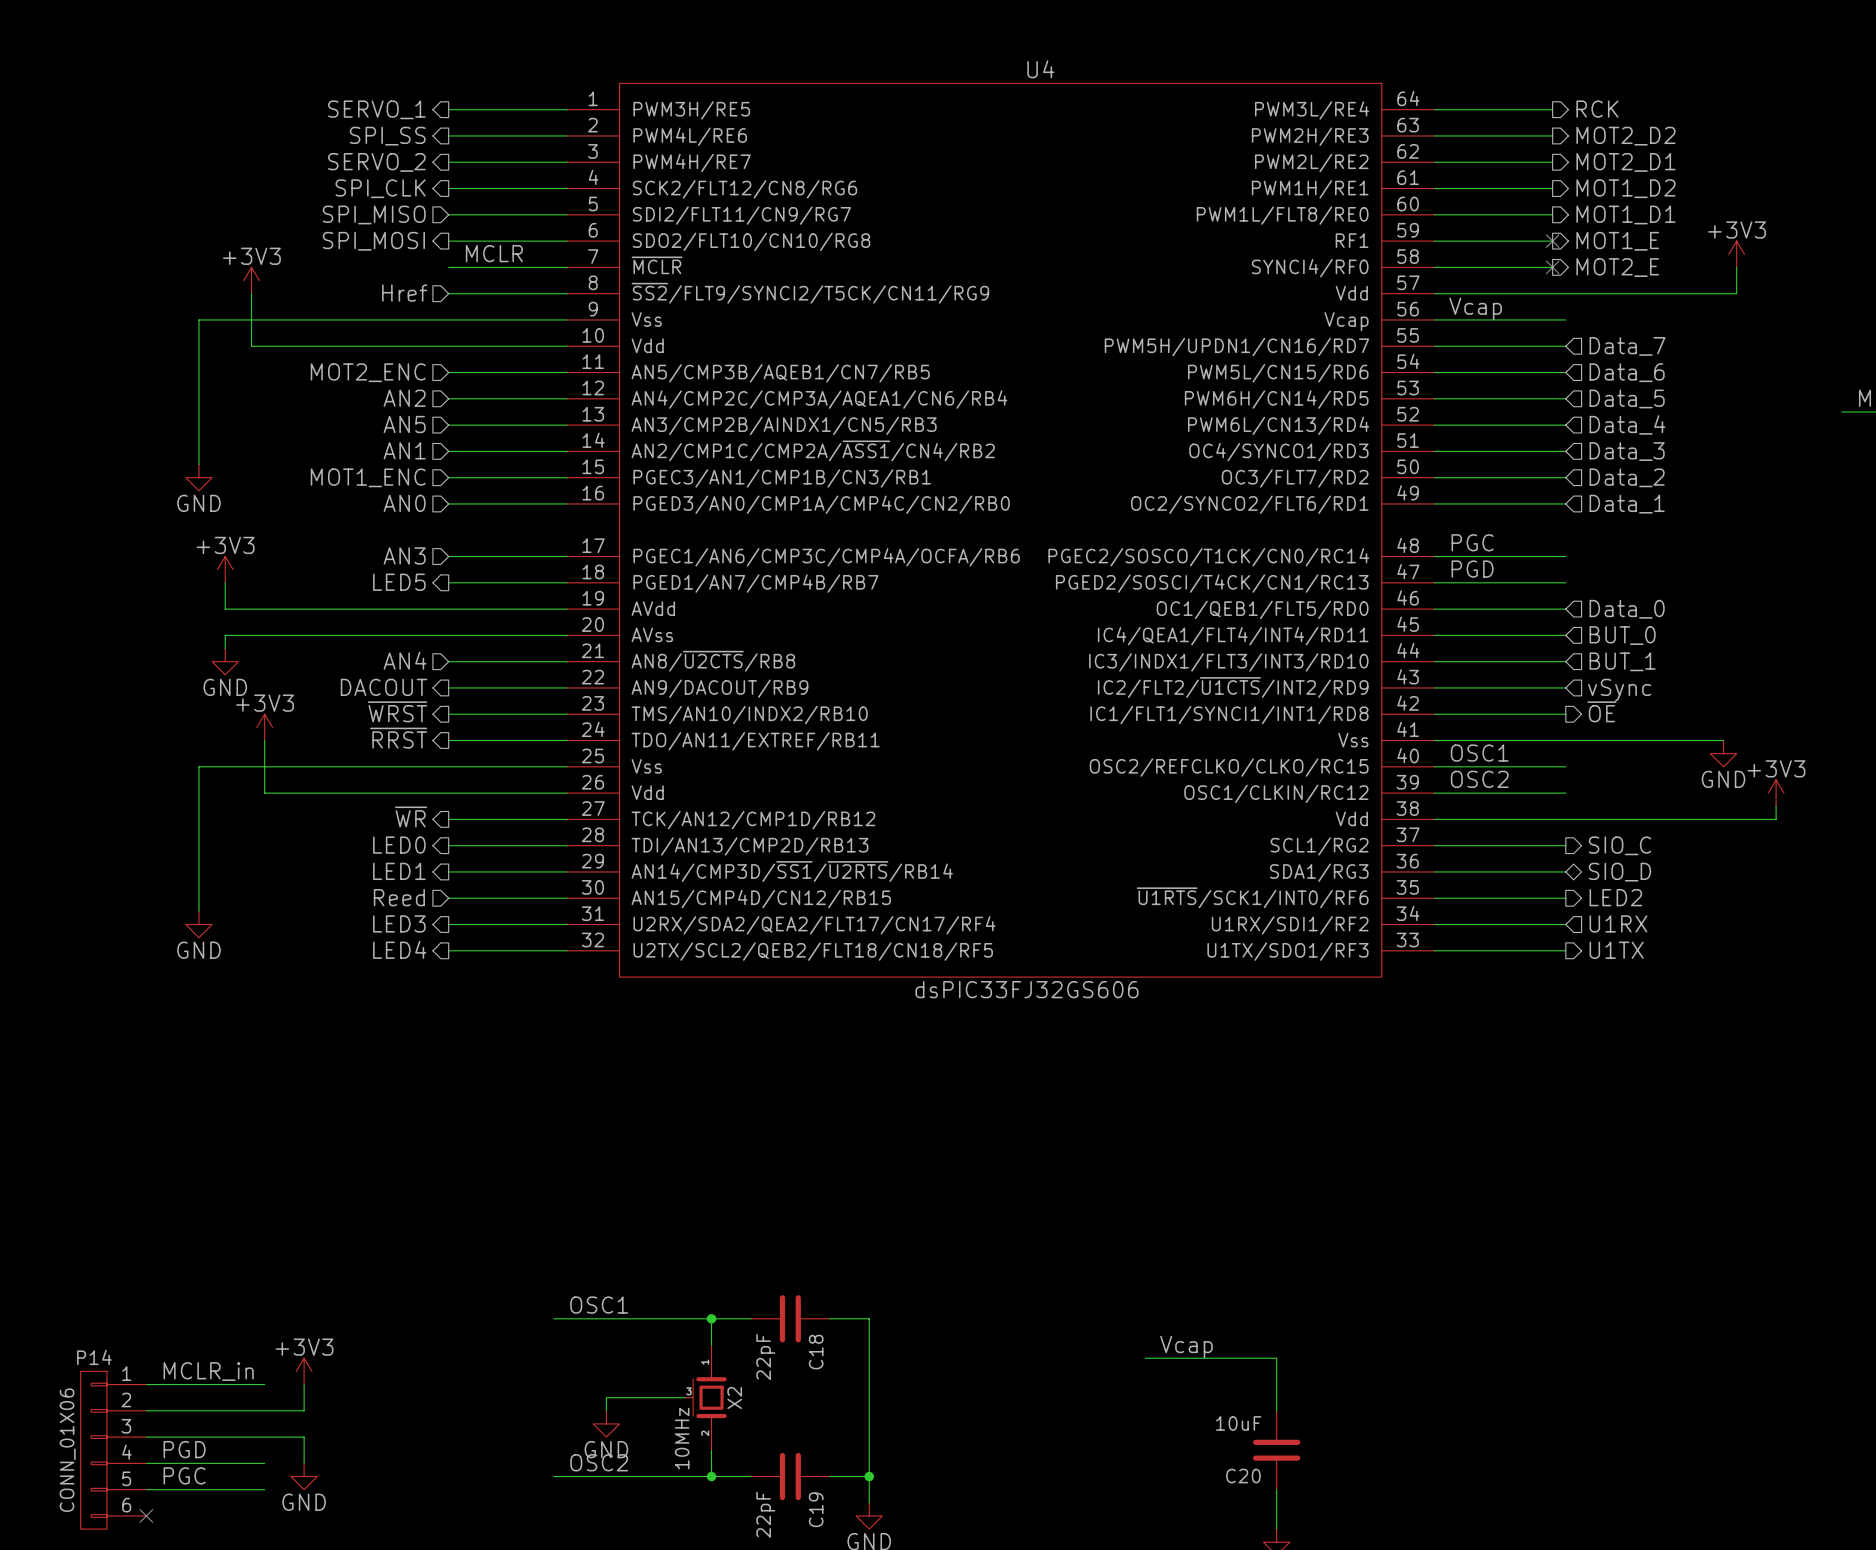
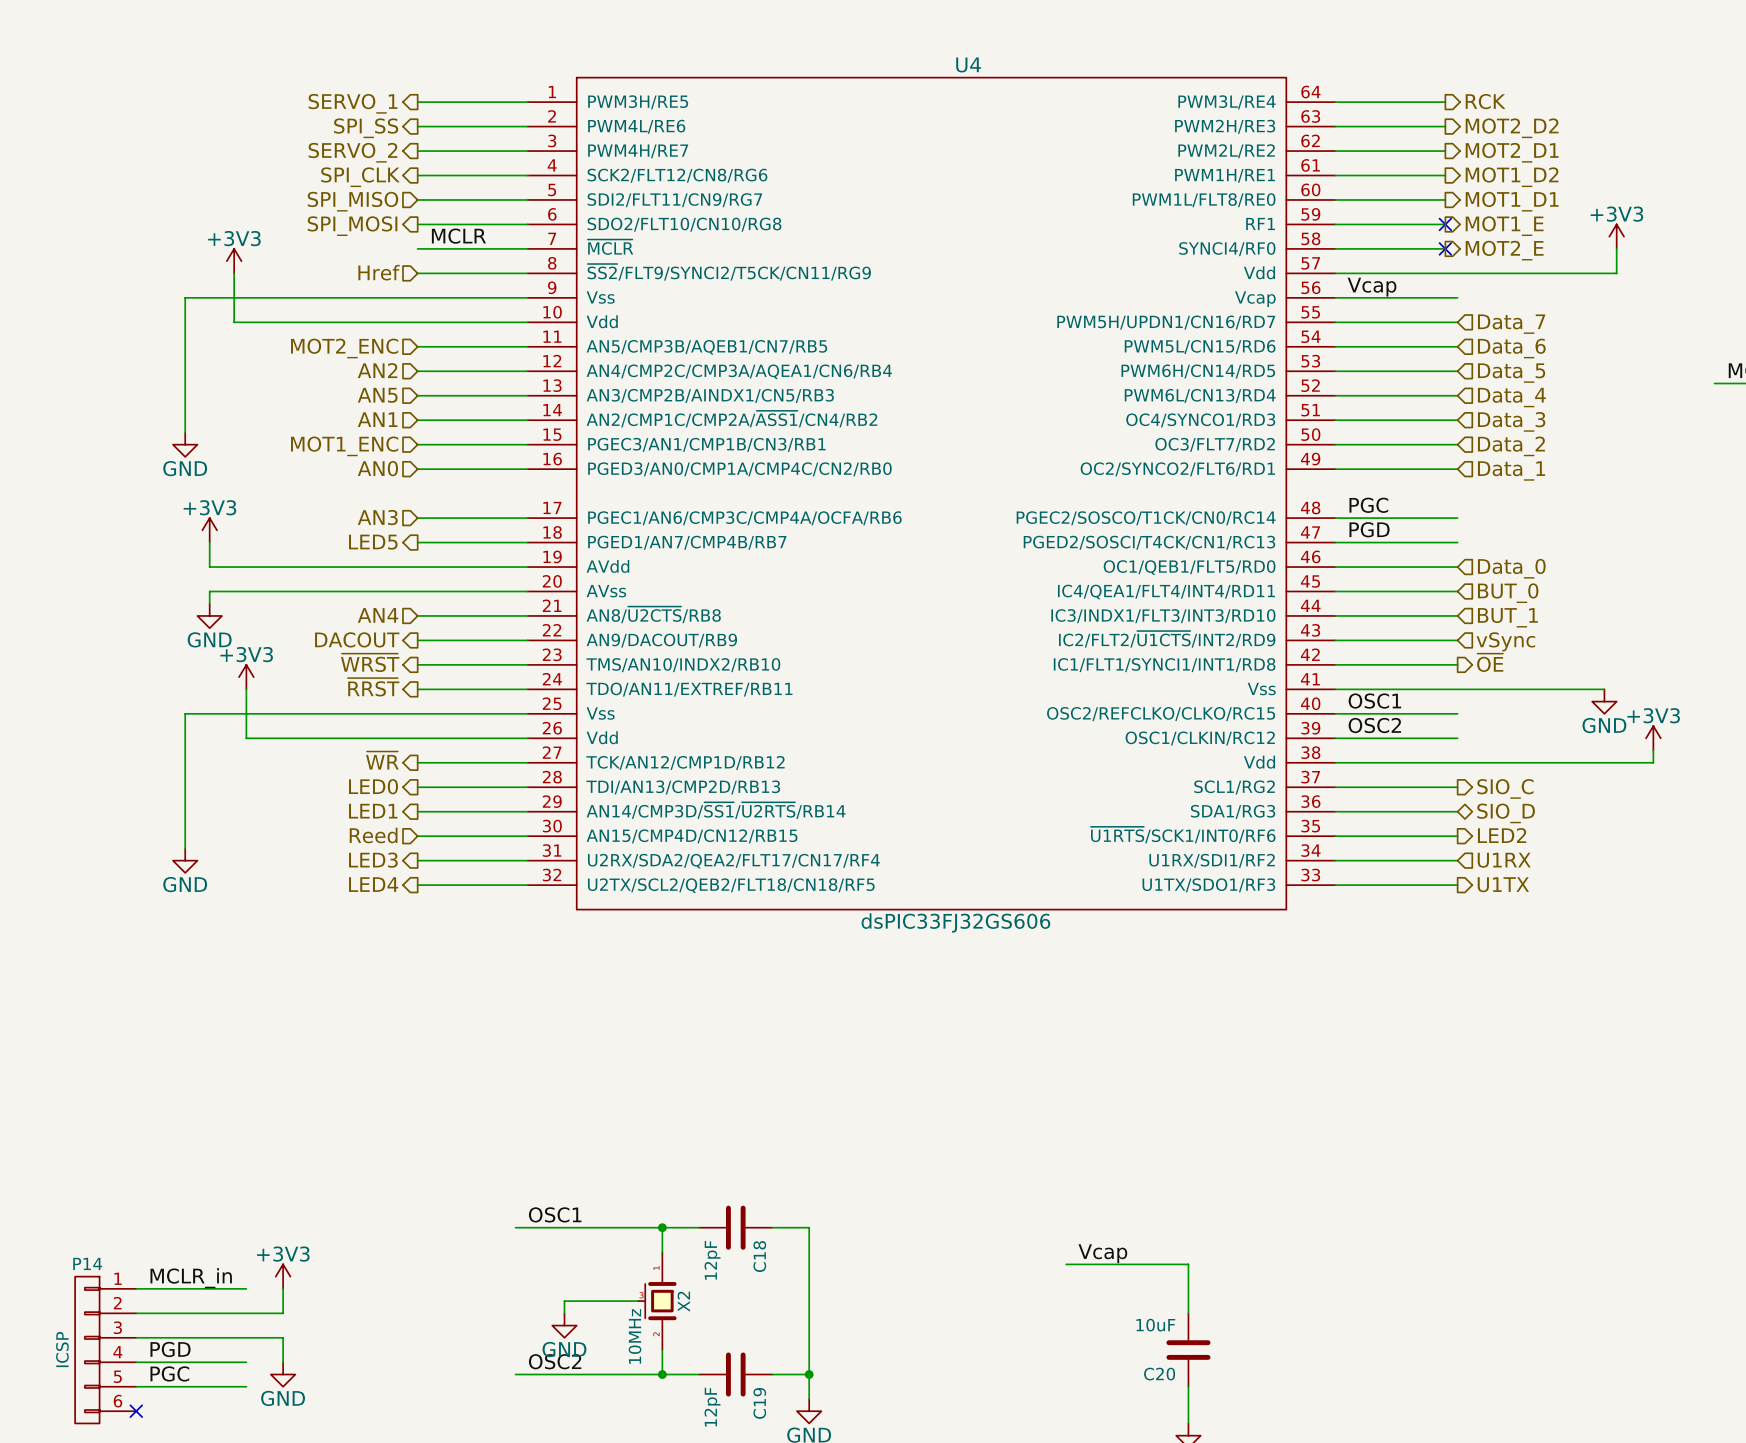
C18 value: 22pF (765, 1357) -> 12pF (712, 1260)
P14 value: CONN_01X06 (67, 1450) -> ICSP (62, 1349)
C19 value: 22pF (765, 1514) -> 12pF (712, 1407)

